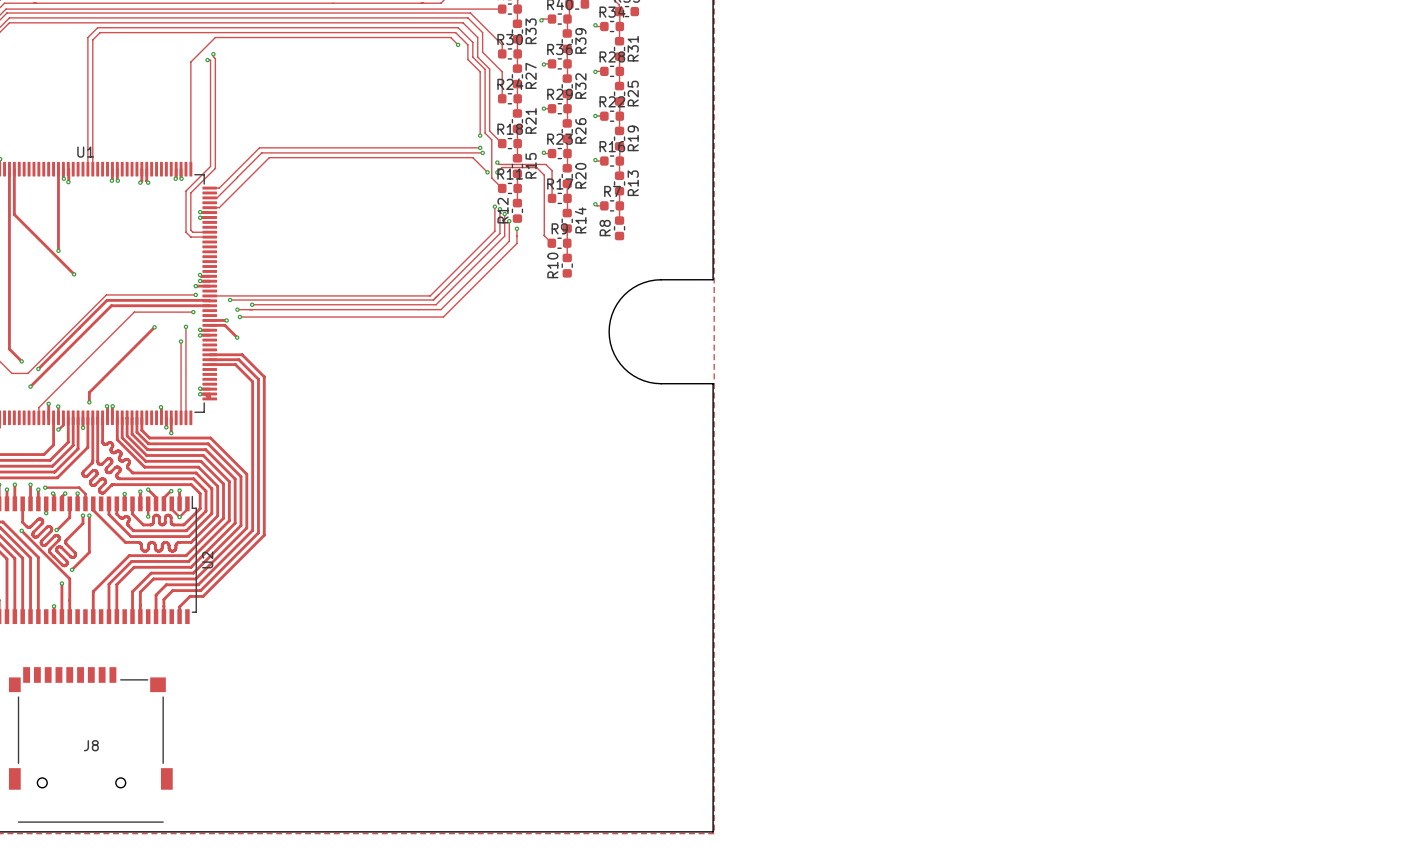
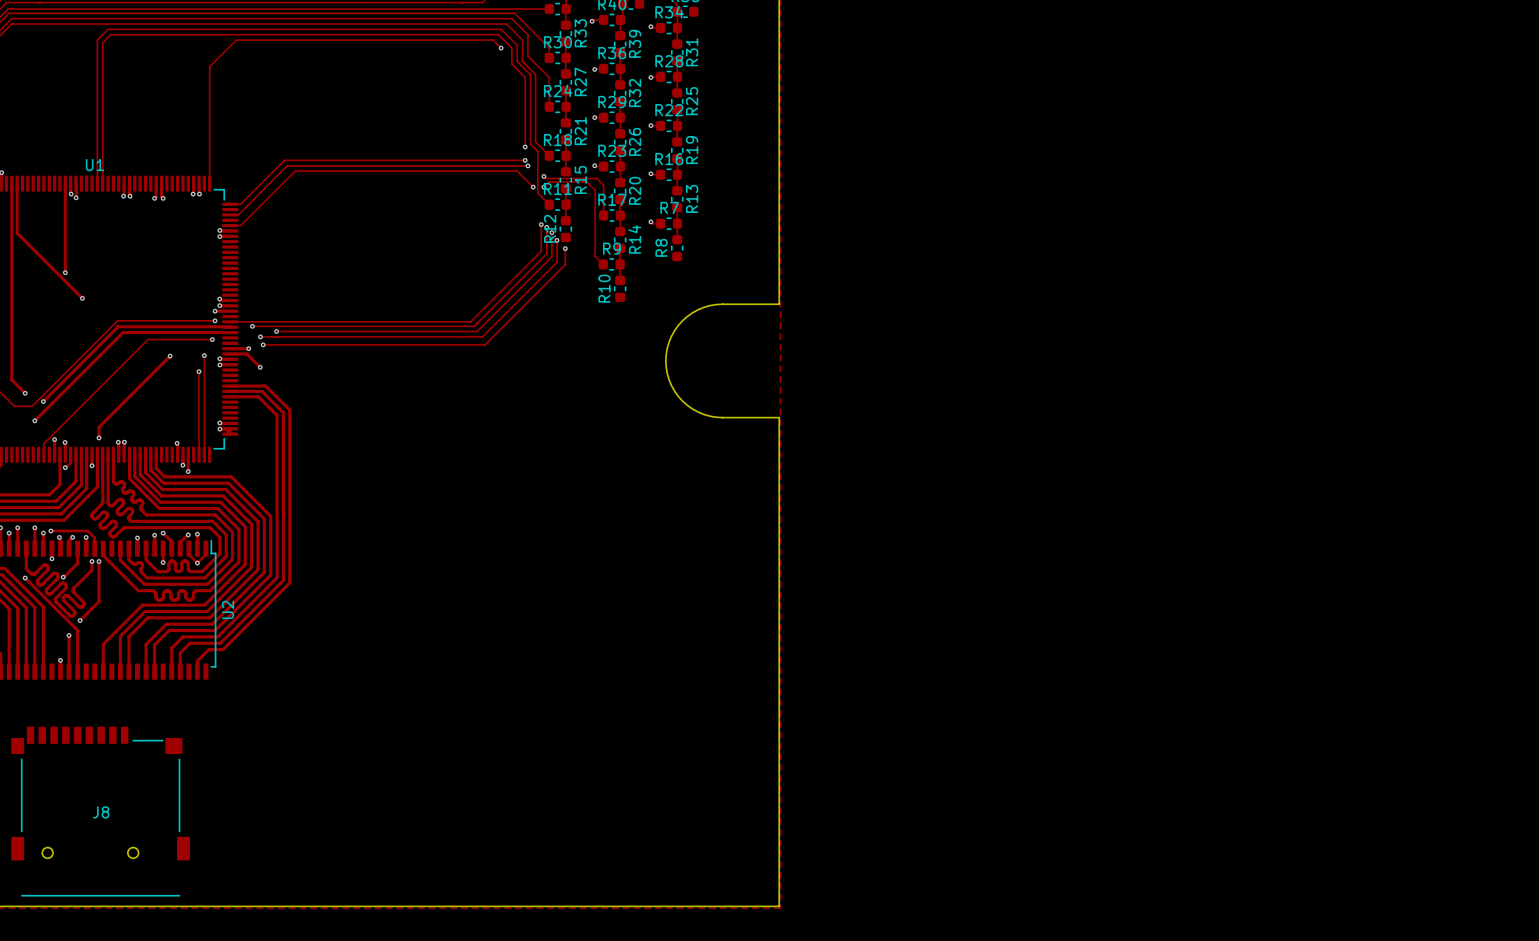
track: (213, 54) (215, 58) (215, 168) (190, 192) (190, 230) (192, 232) (209, 232) -> none
via: (213, 54) -> none
track: (207, 60) (210, 60) (210, 166) (186, 190) (186, 232) (190, 237) (209, 237) -> none
via: (207, 60) -> none

